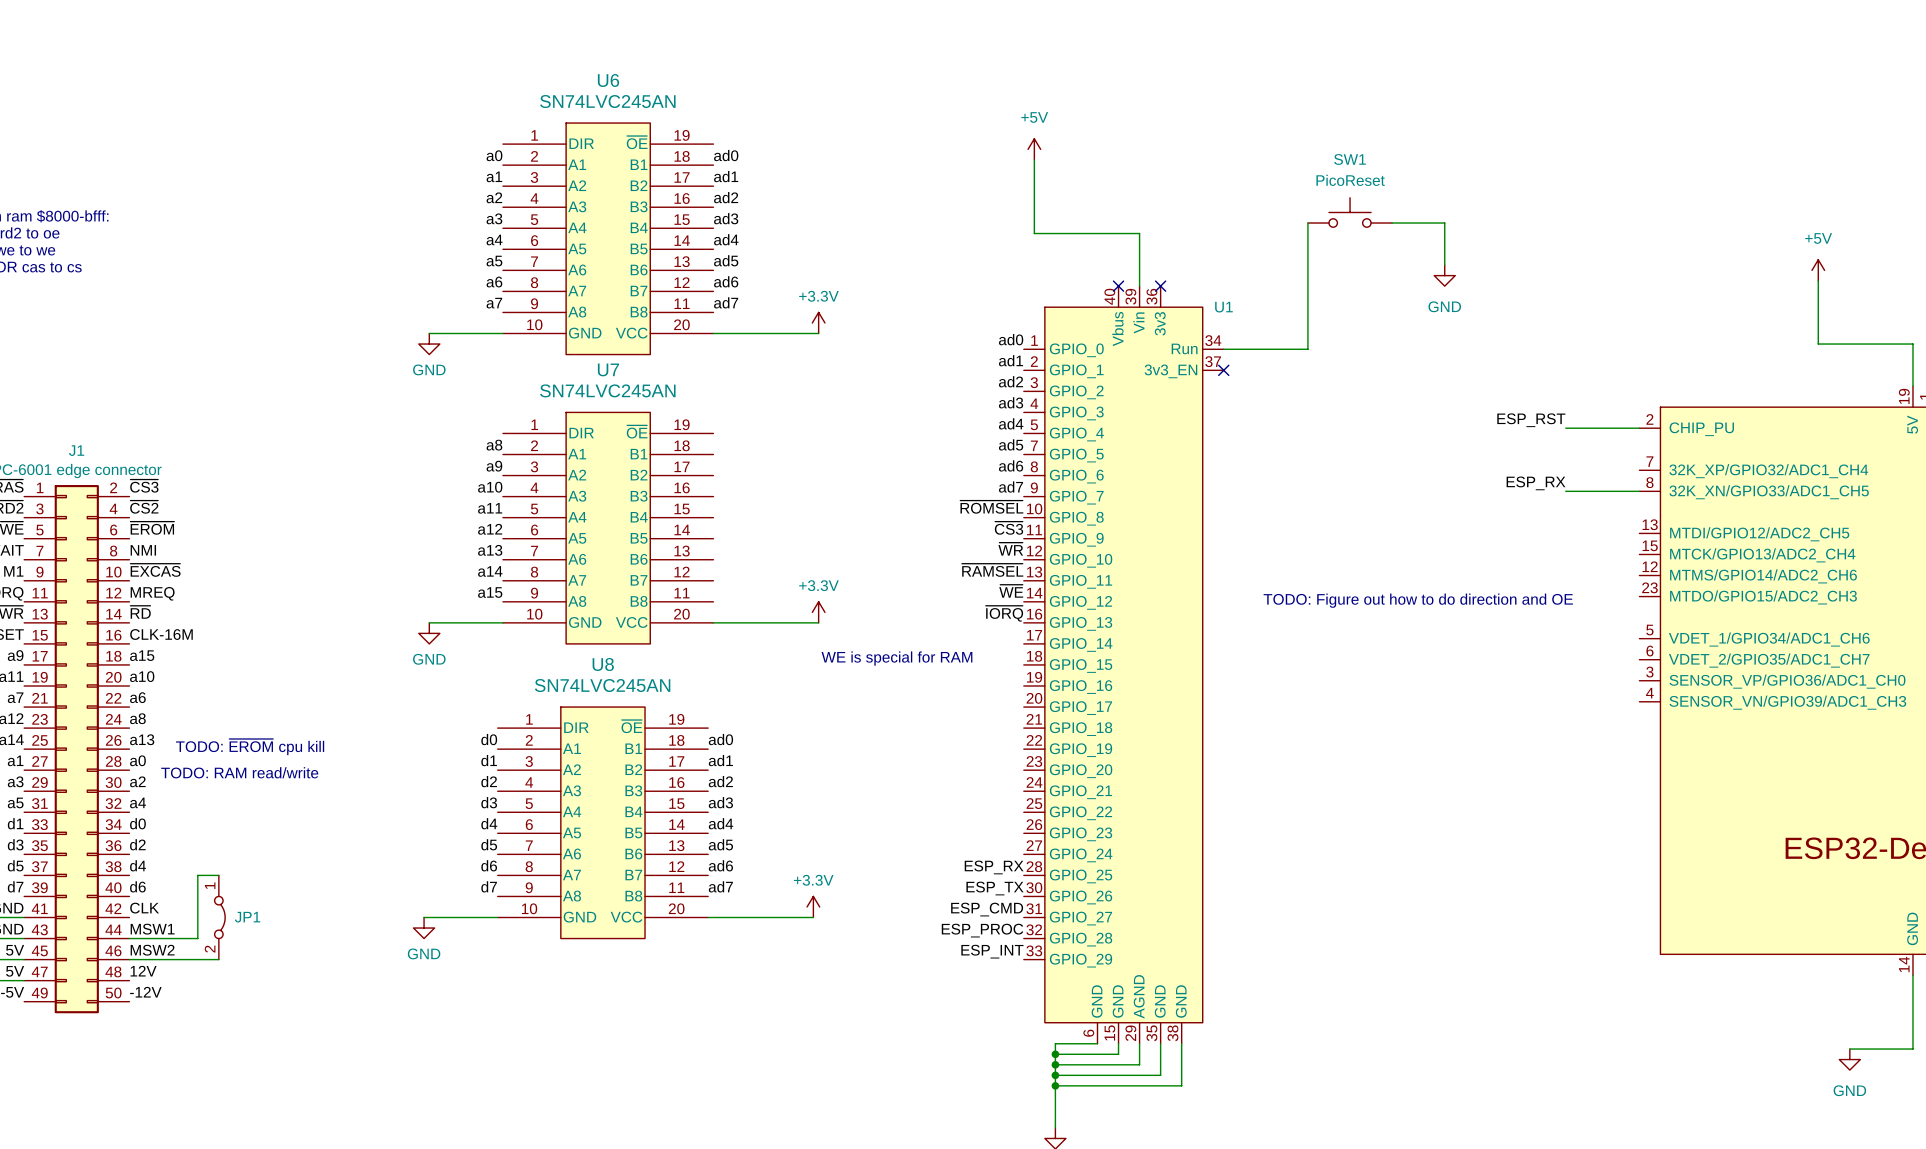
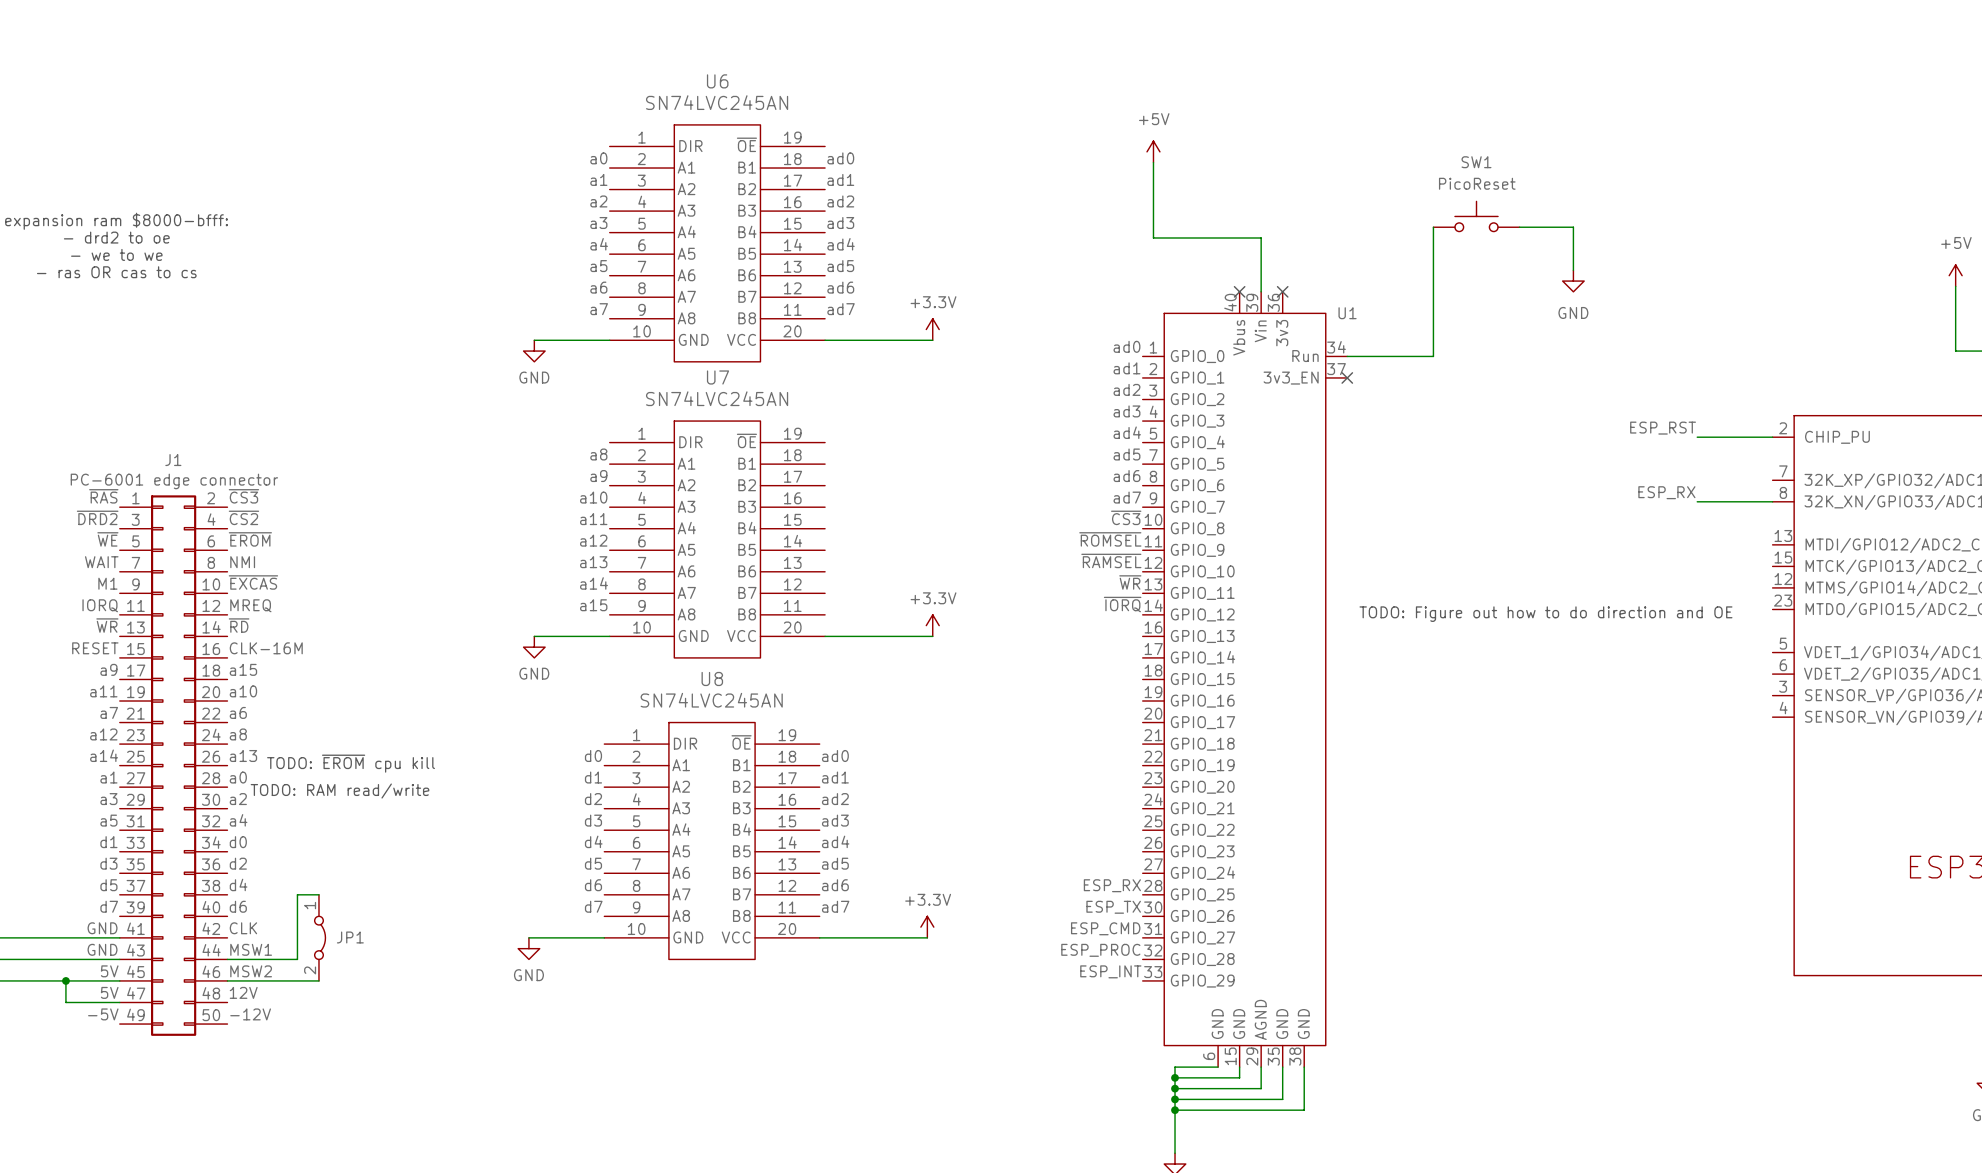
label: ~{ROMSEL} (991, 507) -> ~{CS3} (1126, 517)
label: ~{CS3} (1009, 528) -> ~{ROMSEL} (1110, 539)
label: ~{WR} (1010, 549) -> ~{RAMSEL} (1111, 560)
label: ~{RAMSEL} (992, 570) -> ~{WR} (1130, 582)
label: ~{WE} (1011, 591) -> ~{IORQ} (1122, 604)
label: ~{IORQ} (1004, 613) -> none
text: WE is special for RAM (896, 658) -> none

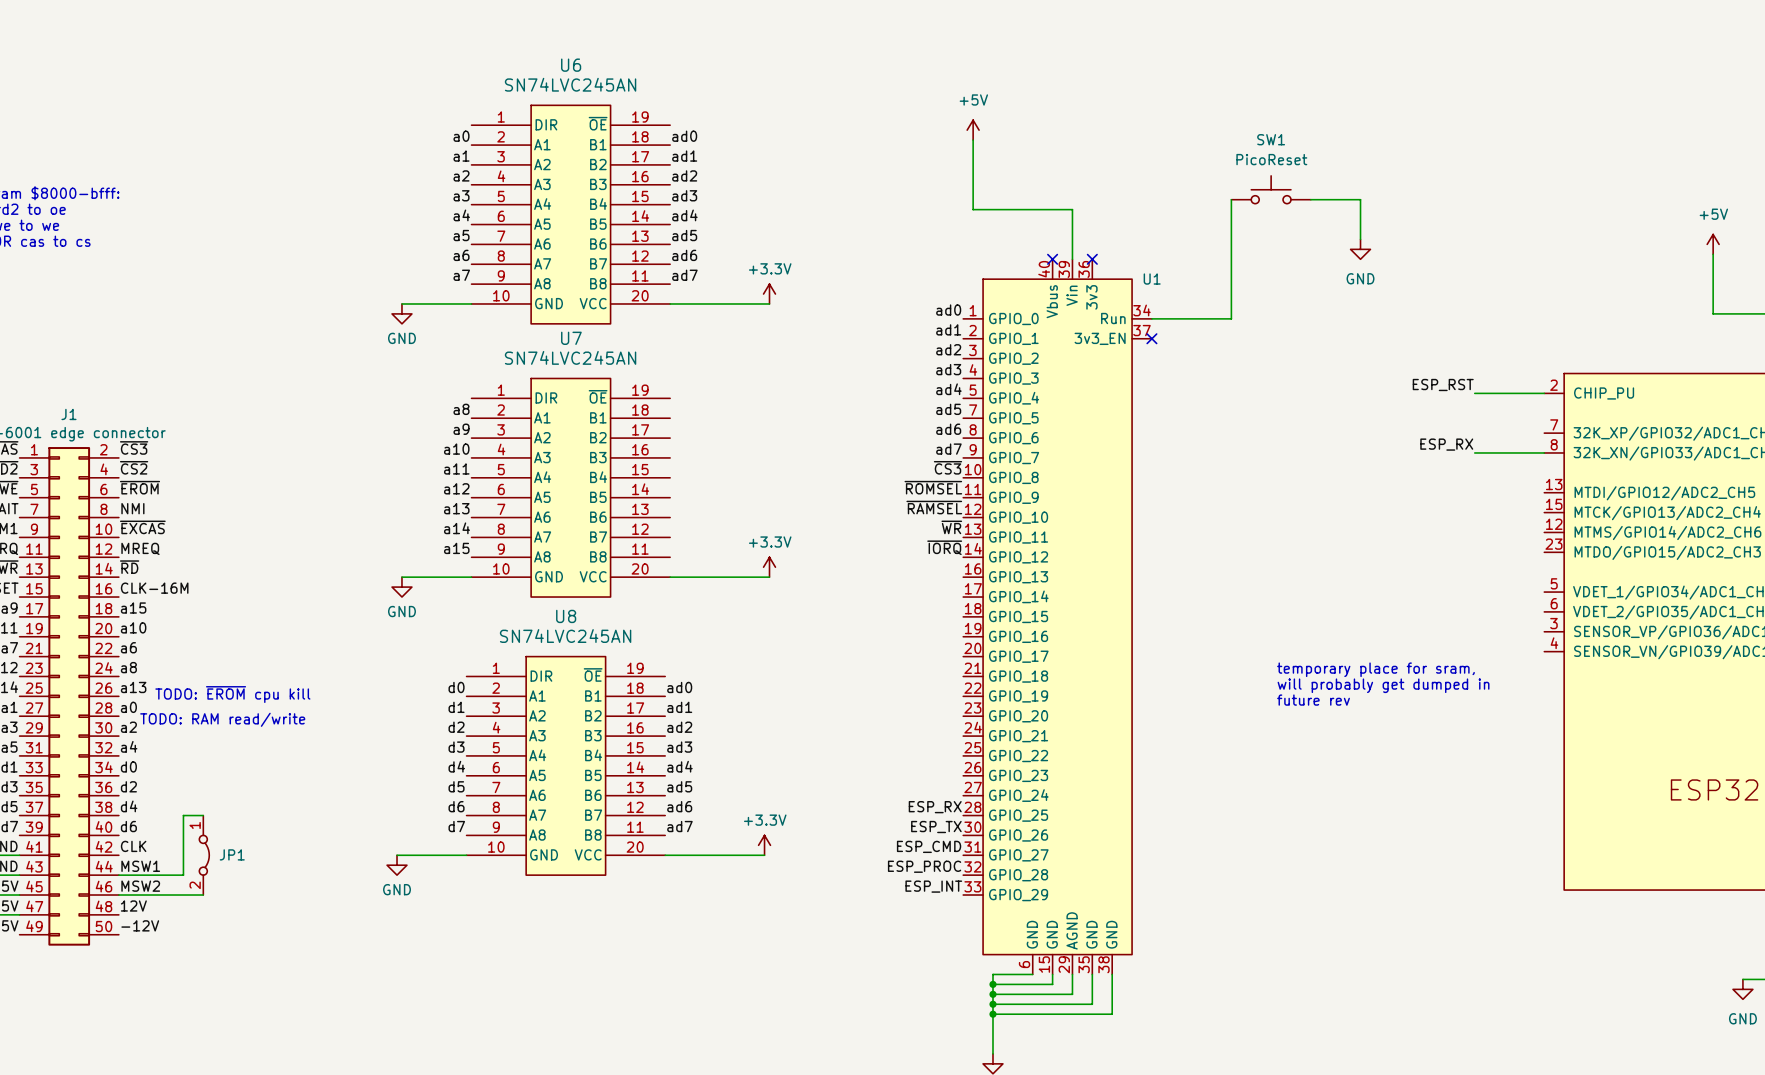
text: TODO: Figure out how to do direction and OE (1545, 614) -> none
text: none -> temporary place for sram, (1375, 669)
text: none -> will probably get dumped in (1383, 685)
text: none -> future rev (1313, 700)

